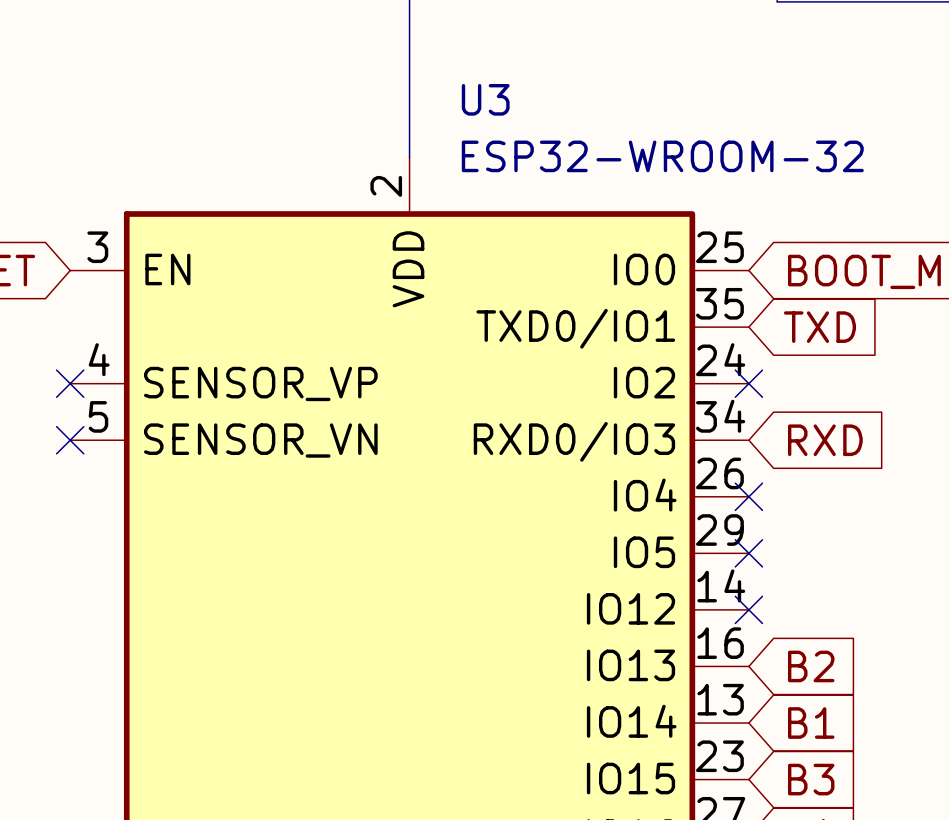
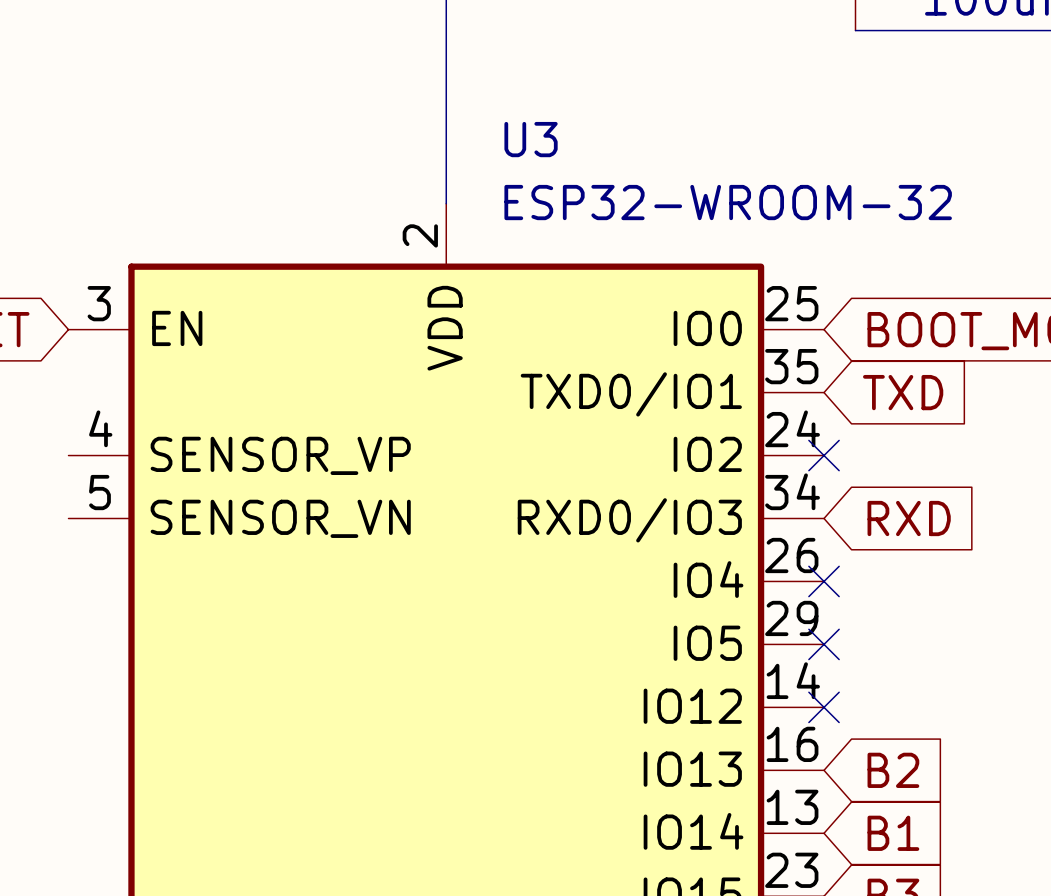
no-connect mark: (70, 383) -> none
no-connect mark: (70, 440) -> none

